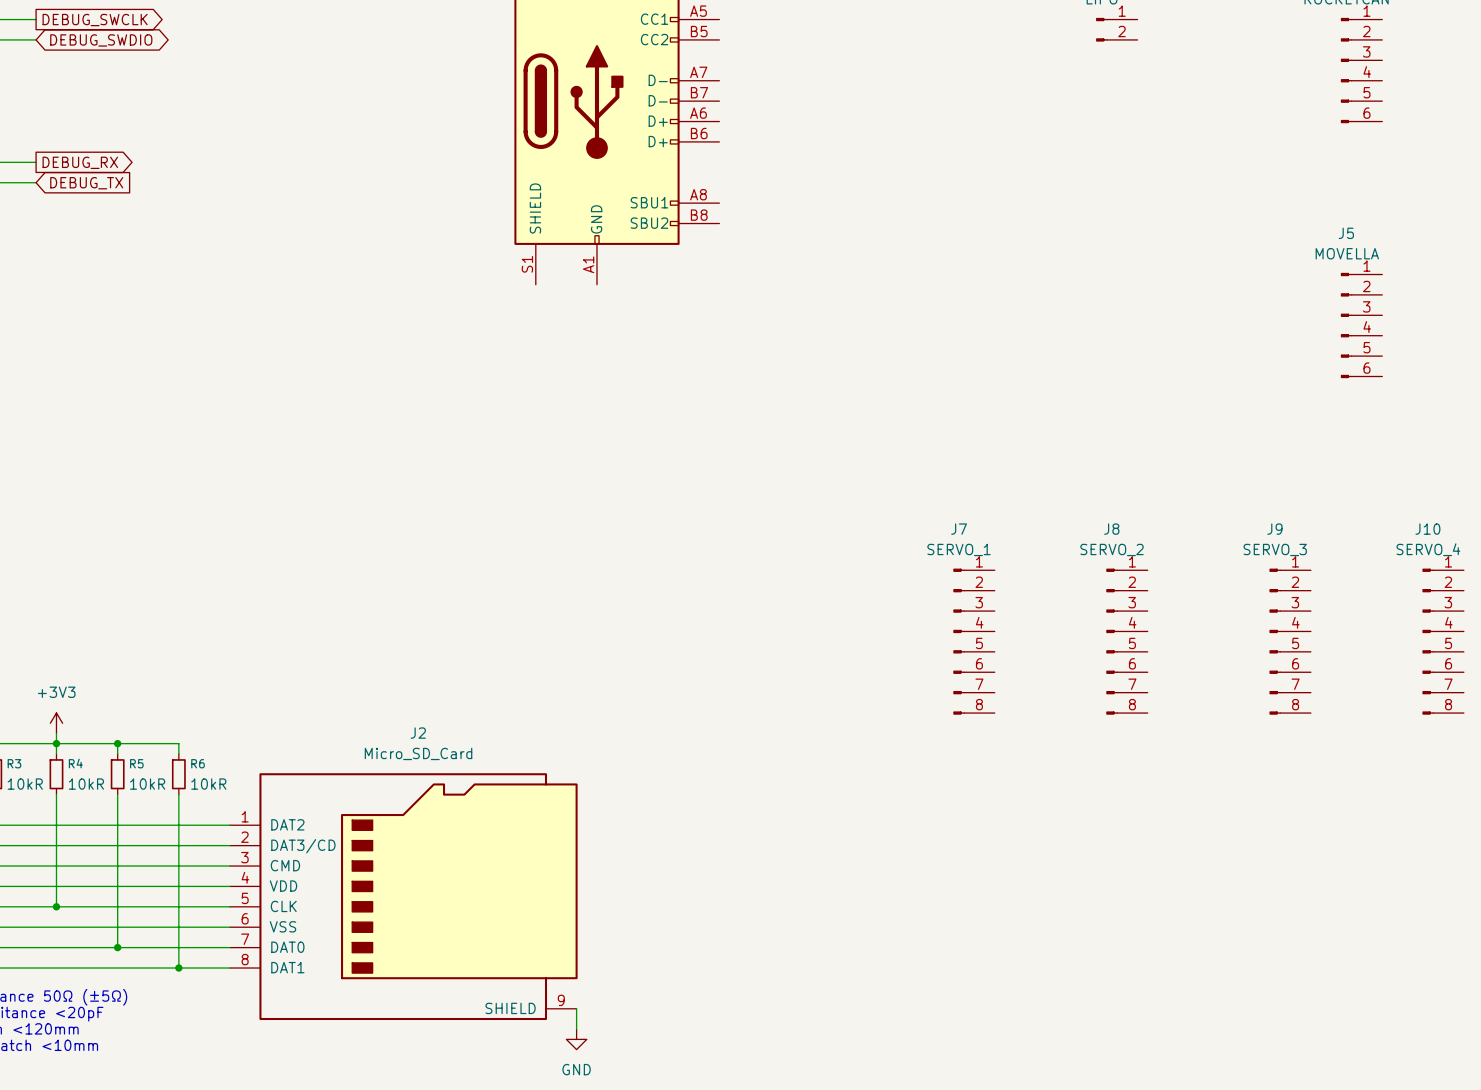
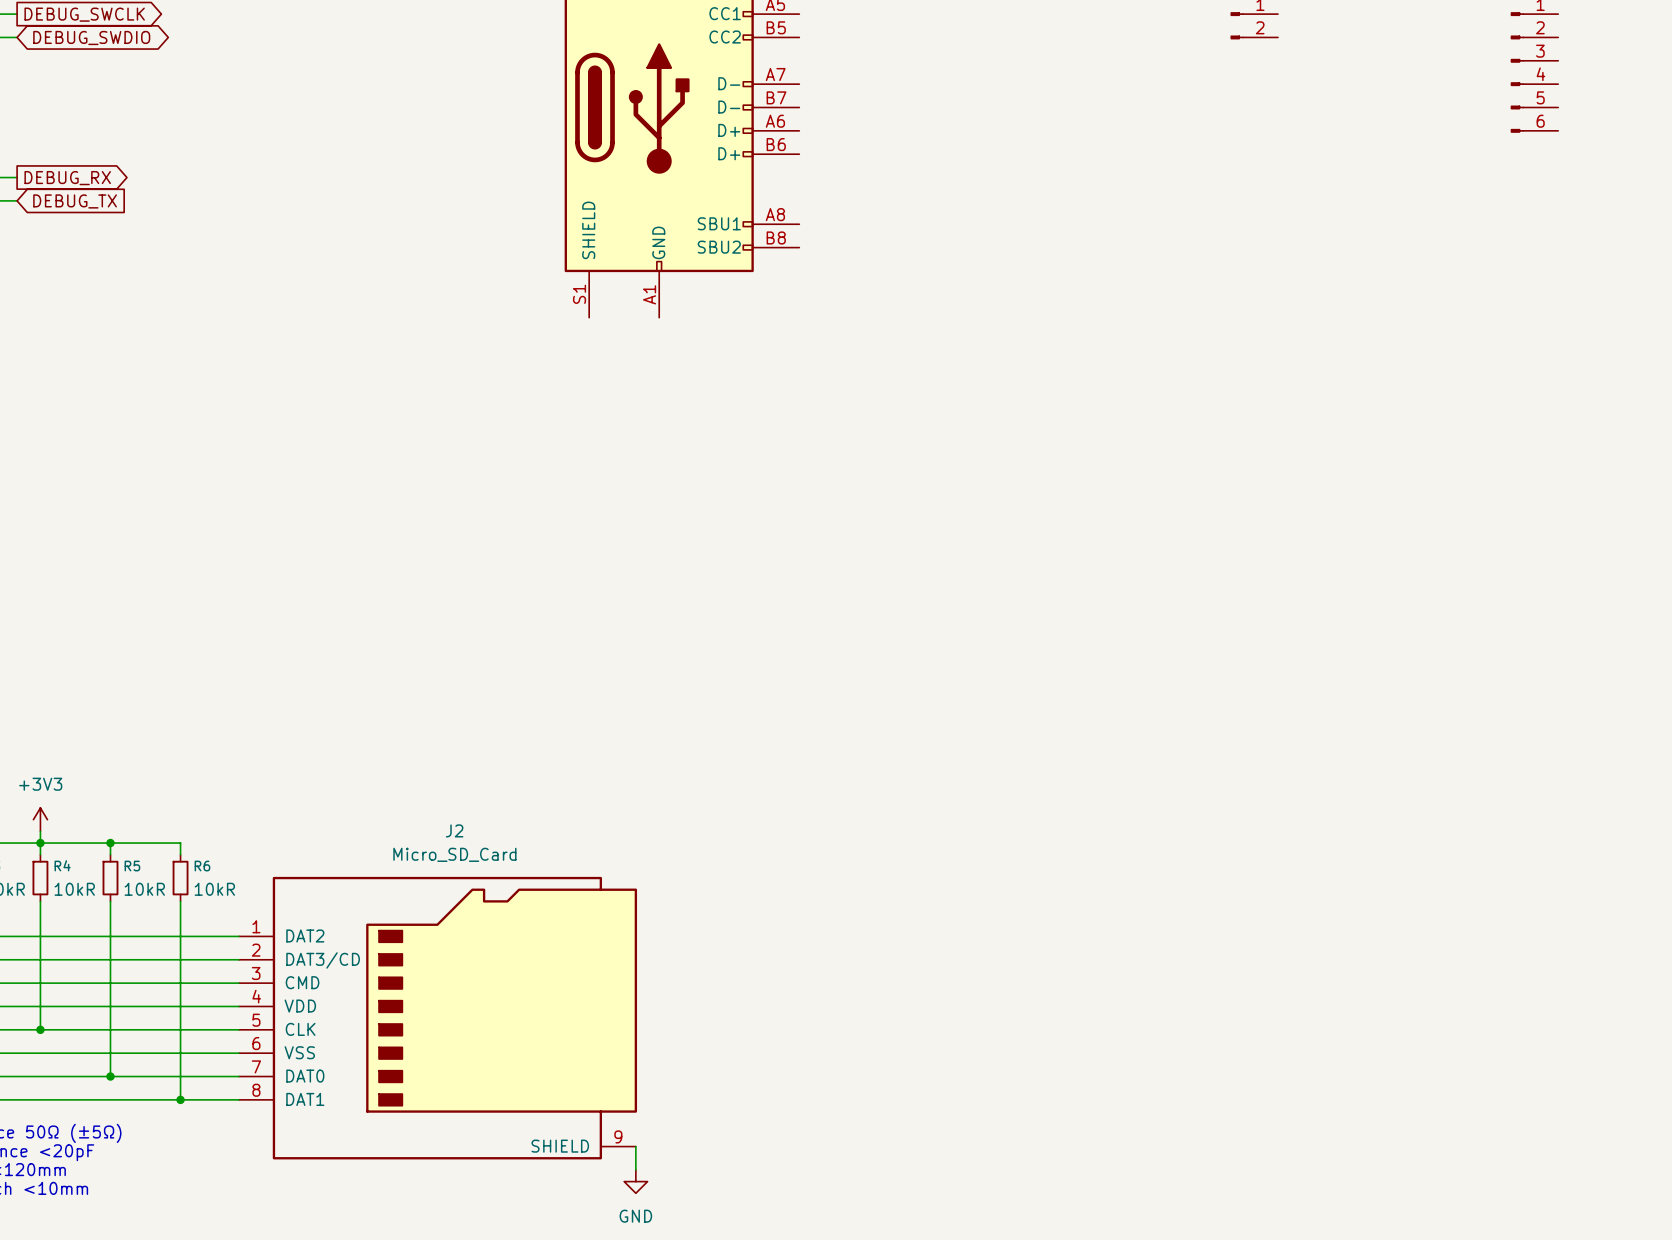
J5: MOVELLA (1361, 325) -> none
J7: SERVO_1 (974, 641) -> none
J8: SERVO_2 (1127, 641) -> none
J9: SERVO_3 (1290, 641) -> none
J10: SERVO_4 (1443, 641) -> none

